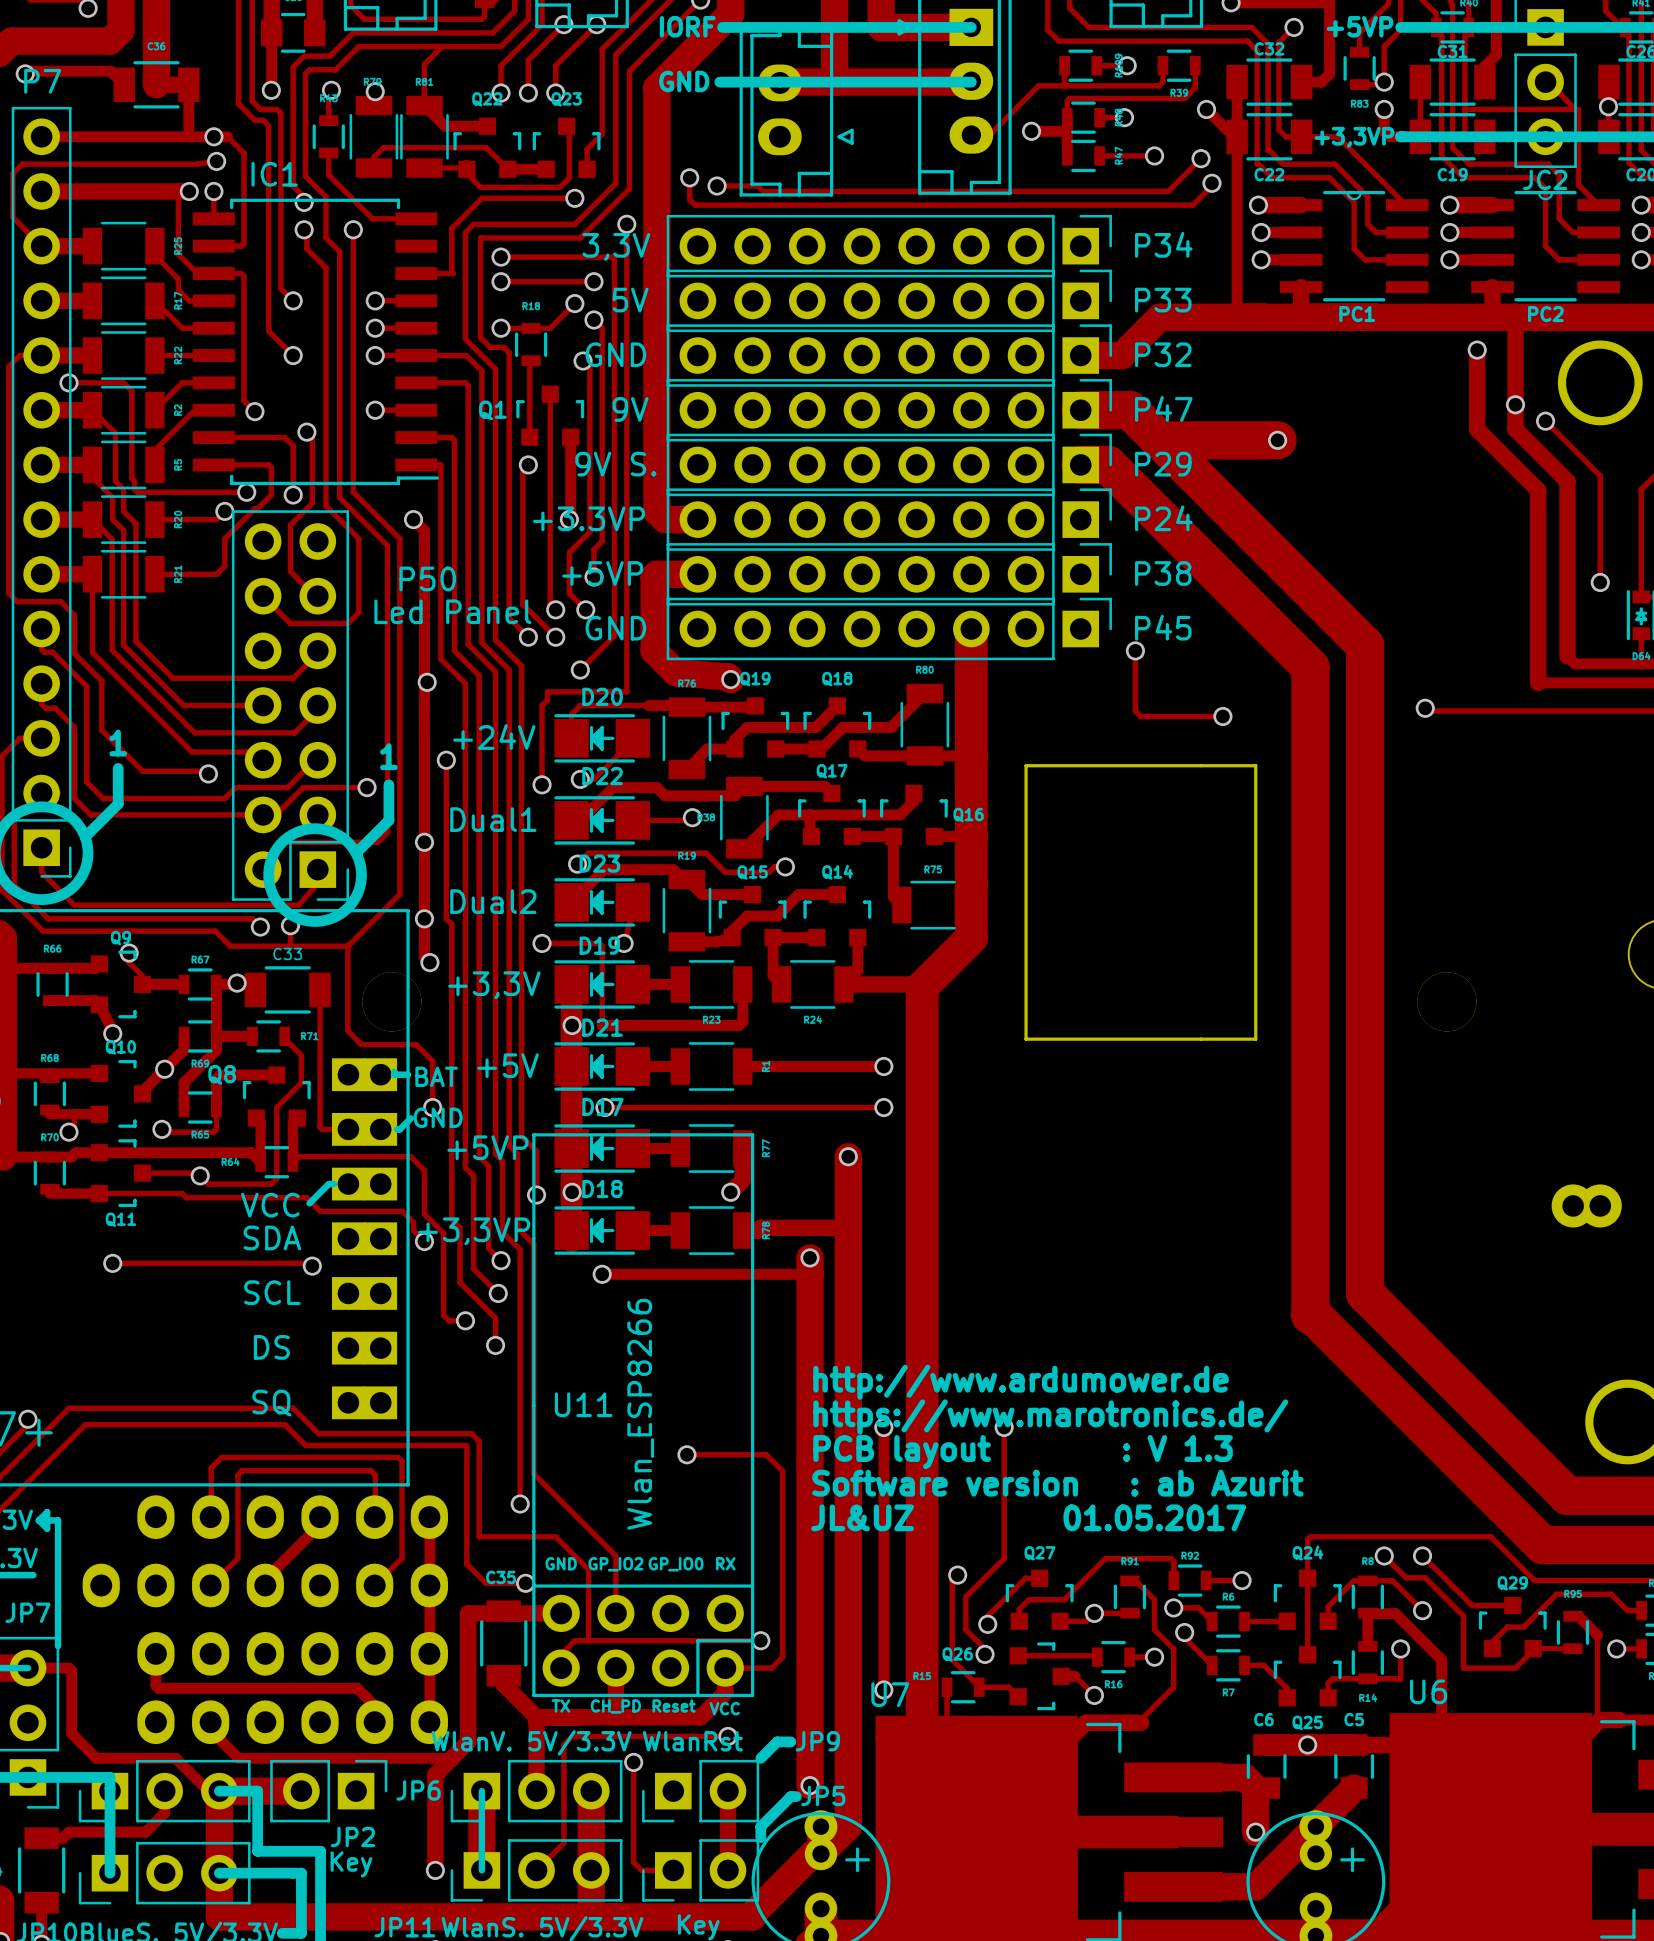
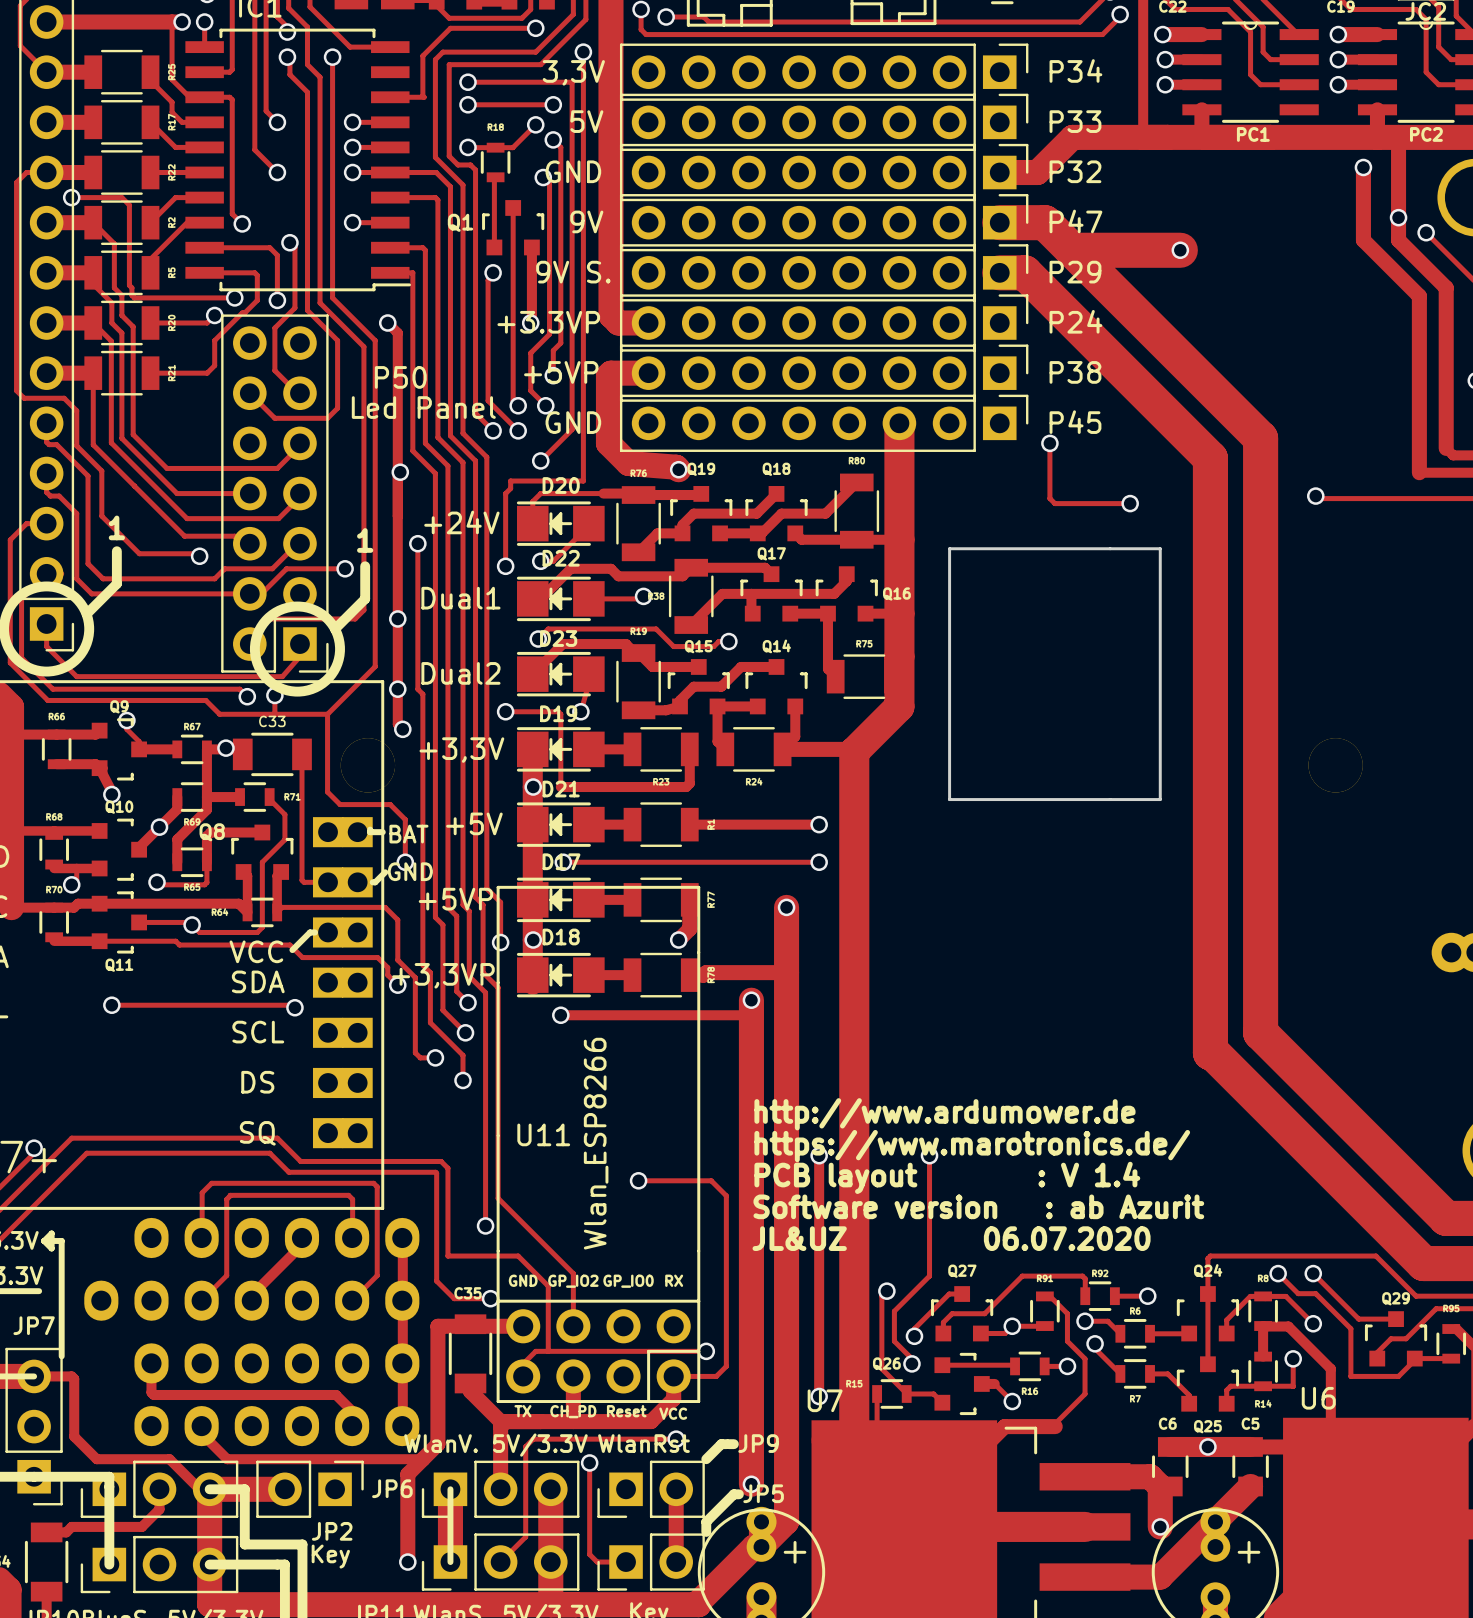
text: PCB layout : V 1.3 (1023, 1452) -> PCB layout : V 1.4 (947, 1177)
text: JL&UZ 01.05.2017 (1028, 1517) -> JL&UZ 06.07.2020 (951, 1238)

